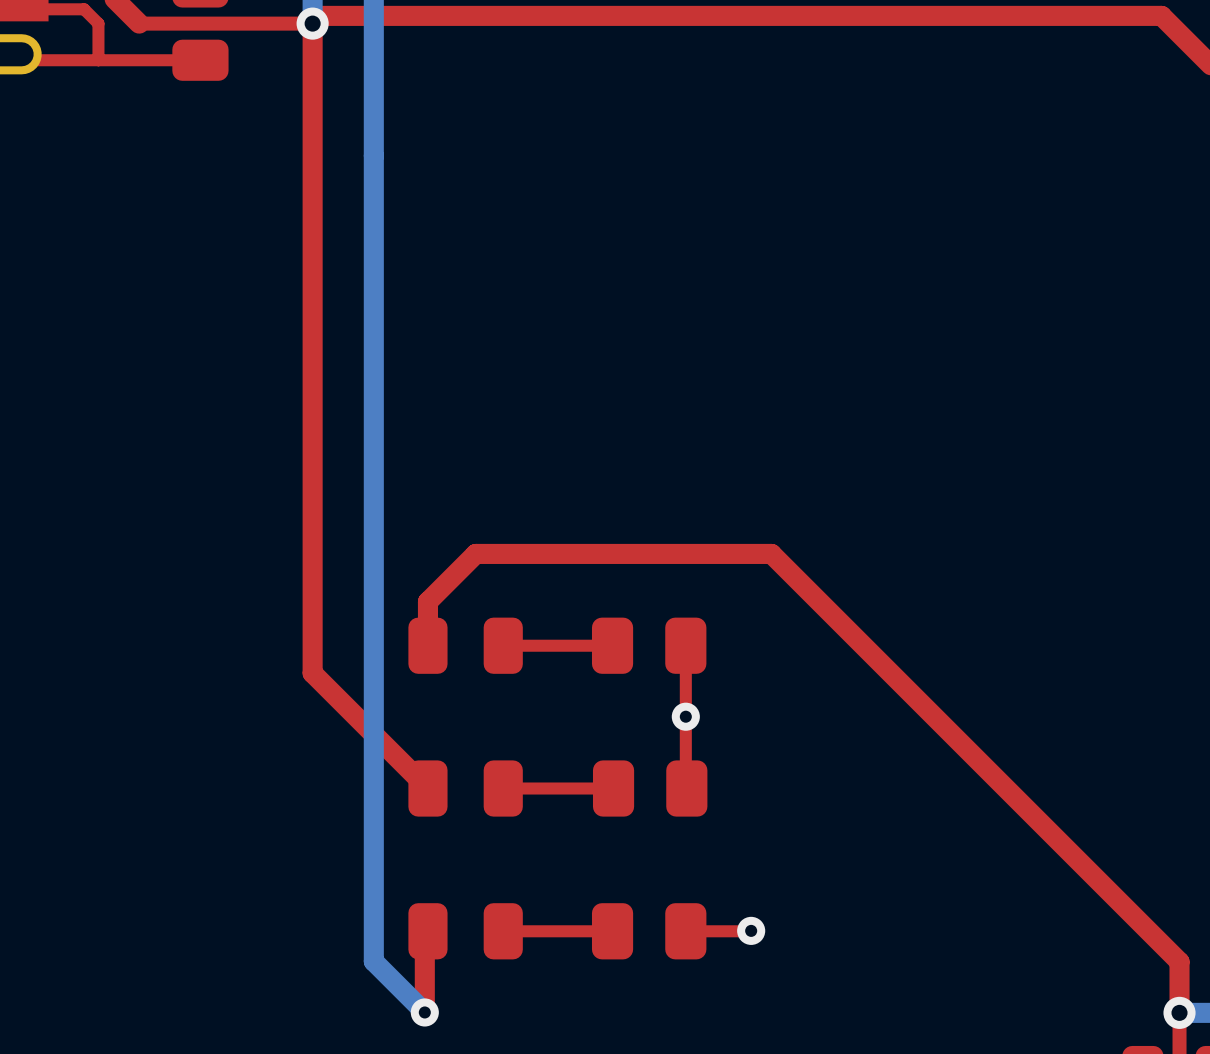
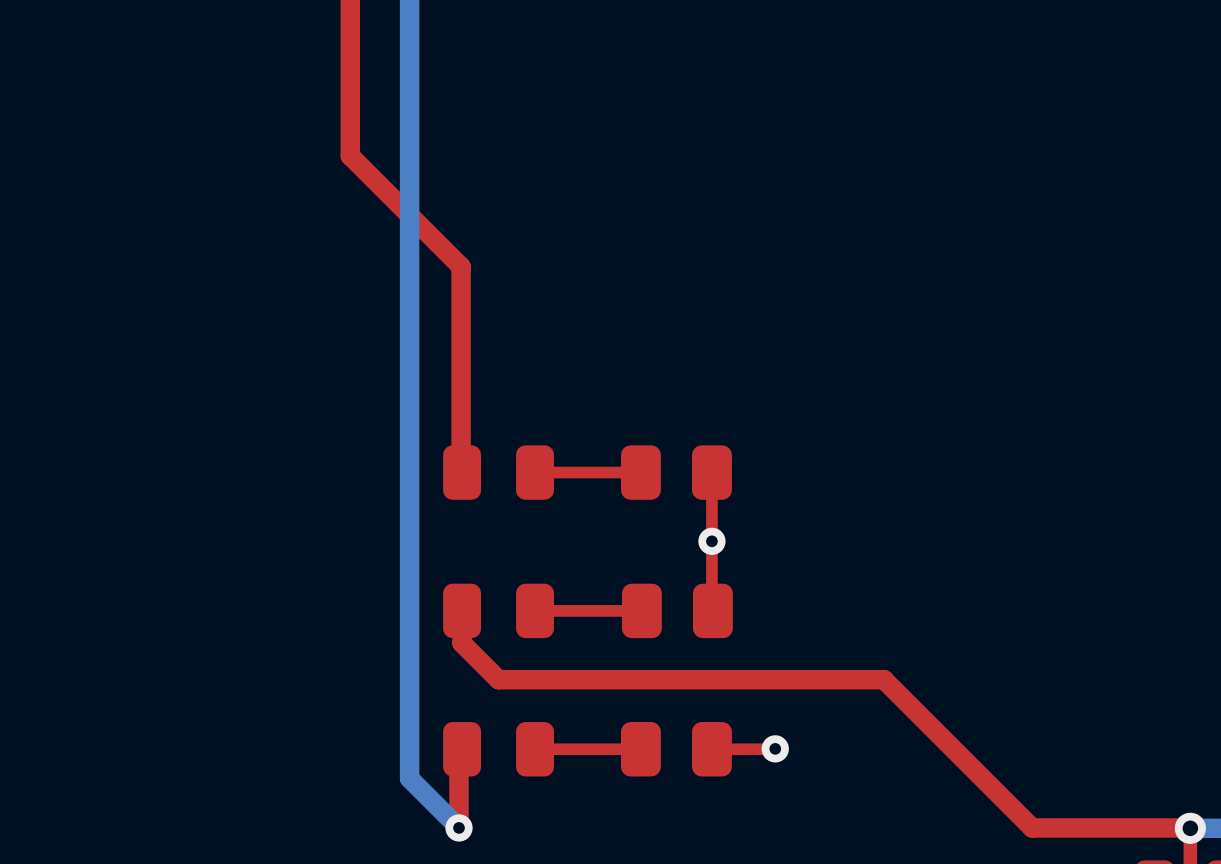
top track: (312, 318) (312, 673) (427, 788) -> (350, 155) (461, 266) (461, 472)
top track: (427, 645) (427, 601) (475, 553) (771, 553) (1179, 961) (1179, 1012) -> (462, 610) (462, 643) (498, 679) (883, 679) (1032, 827) (1189, 827)

